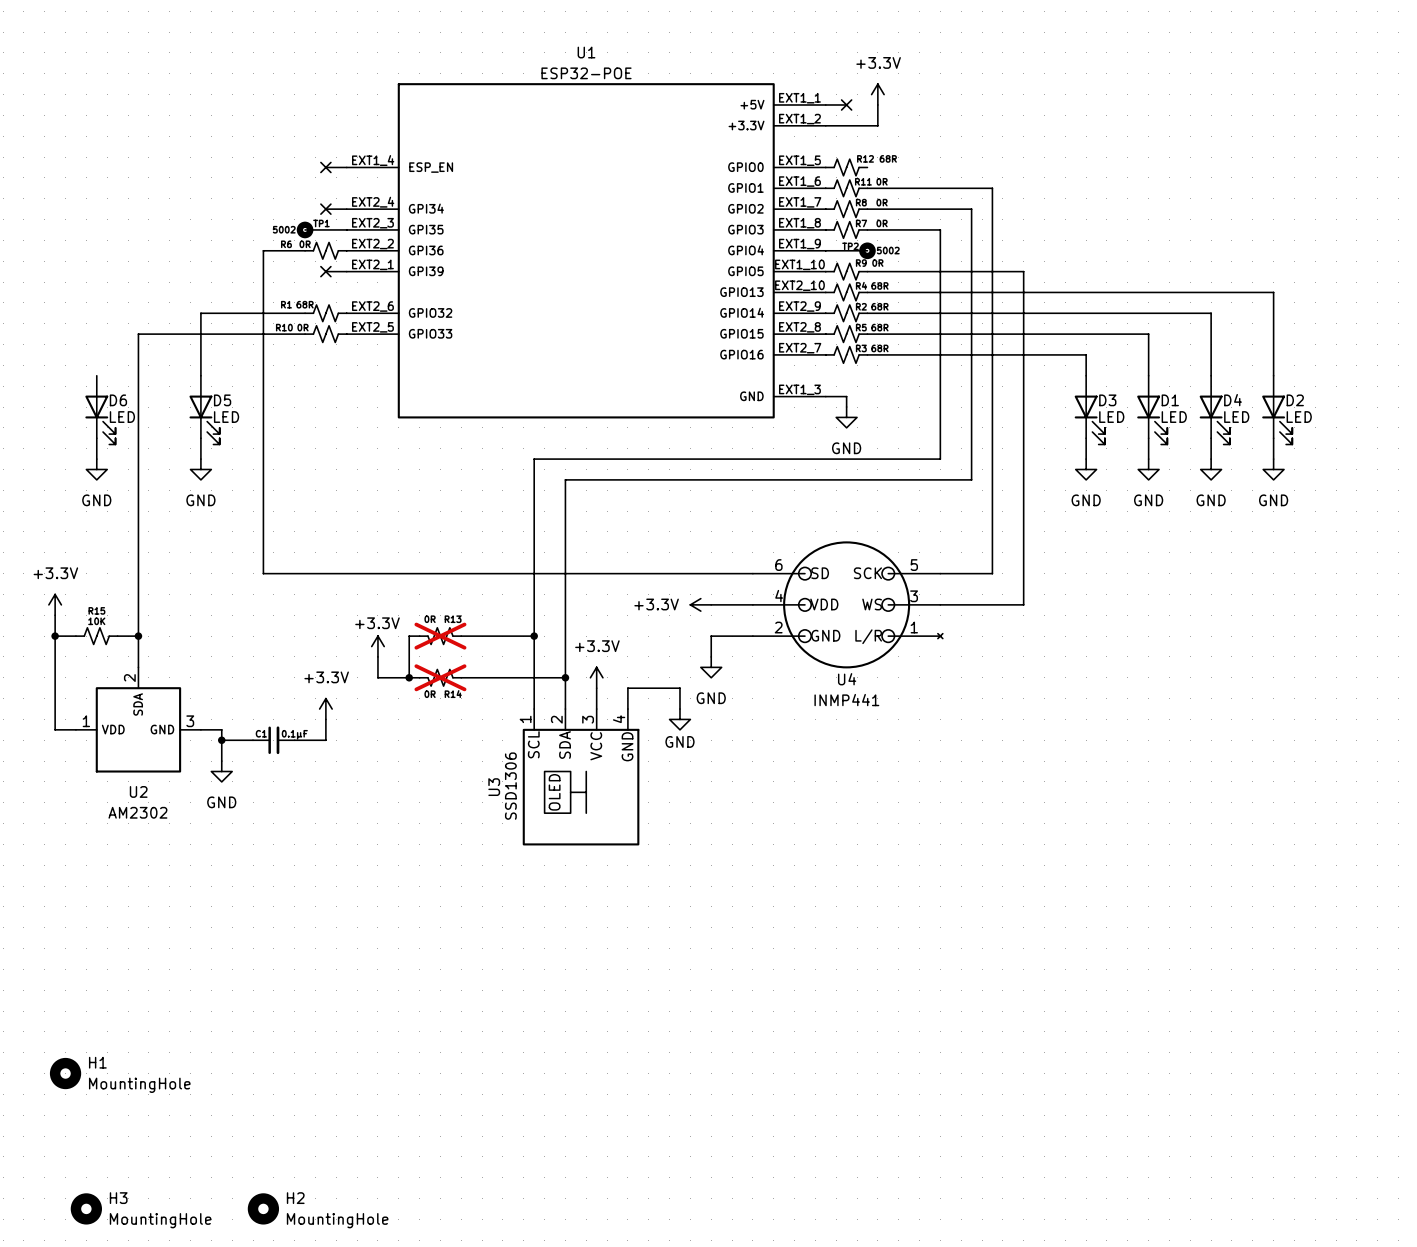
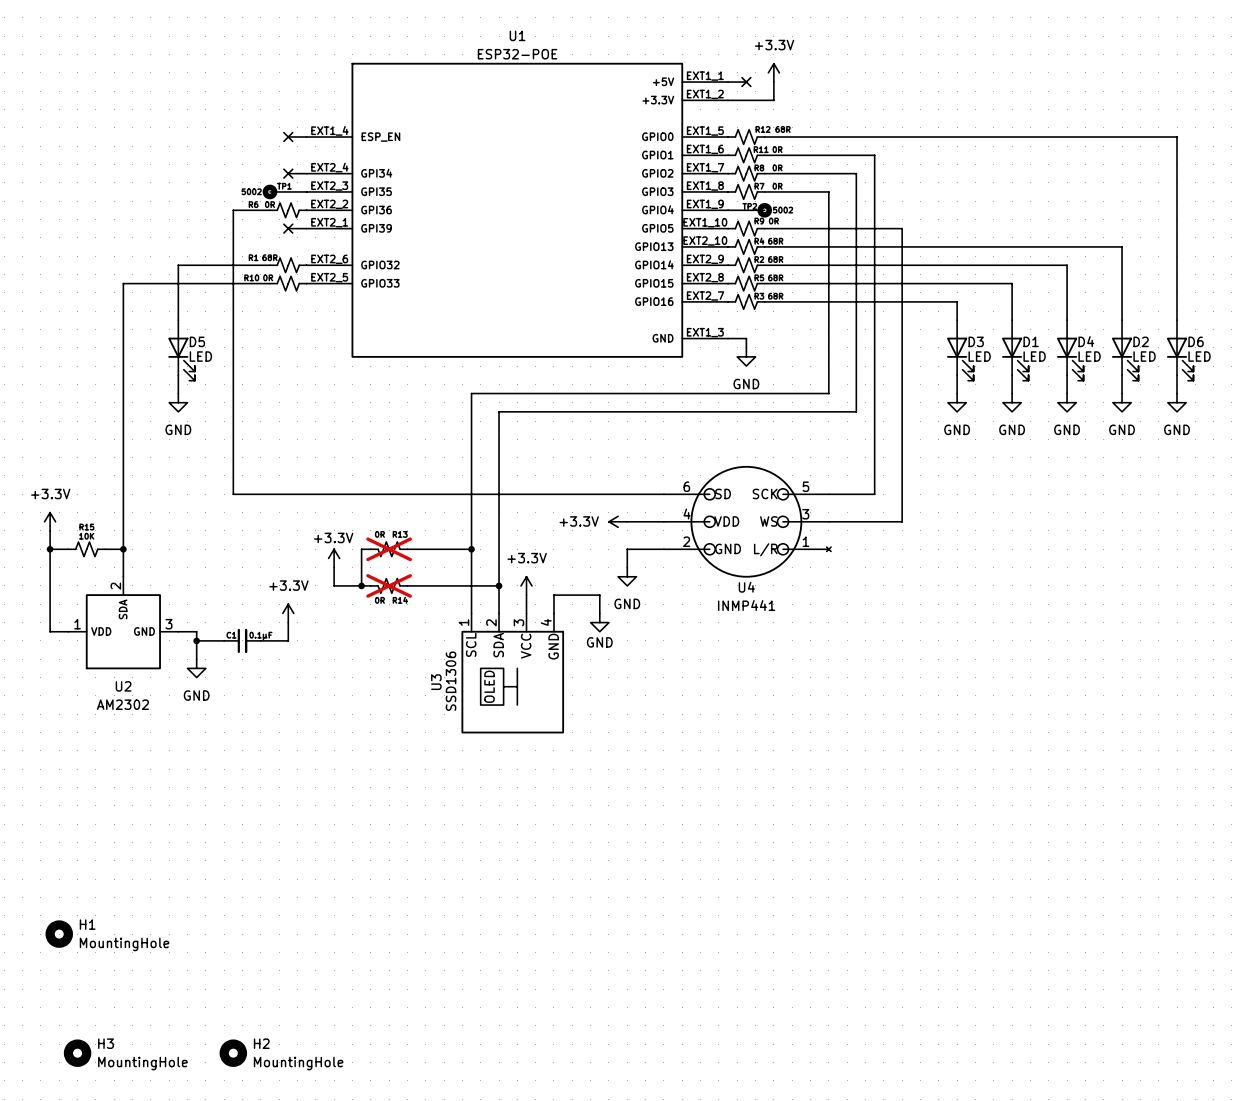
wire: none -> (764, 137) (1177, 137) (1177, 320)
D6 position: (100, 410) -> (1180, 350)
wire: (96, 438) (96, 459) -> none
wire: none -> (1177, 375) (1177, 393)
power symbol: GND (96, 469) -> none
power symbol: none -> GND (1177, 402)

